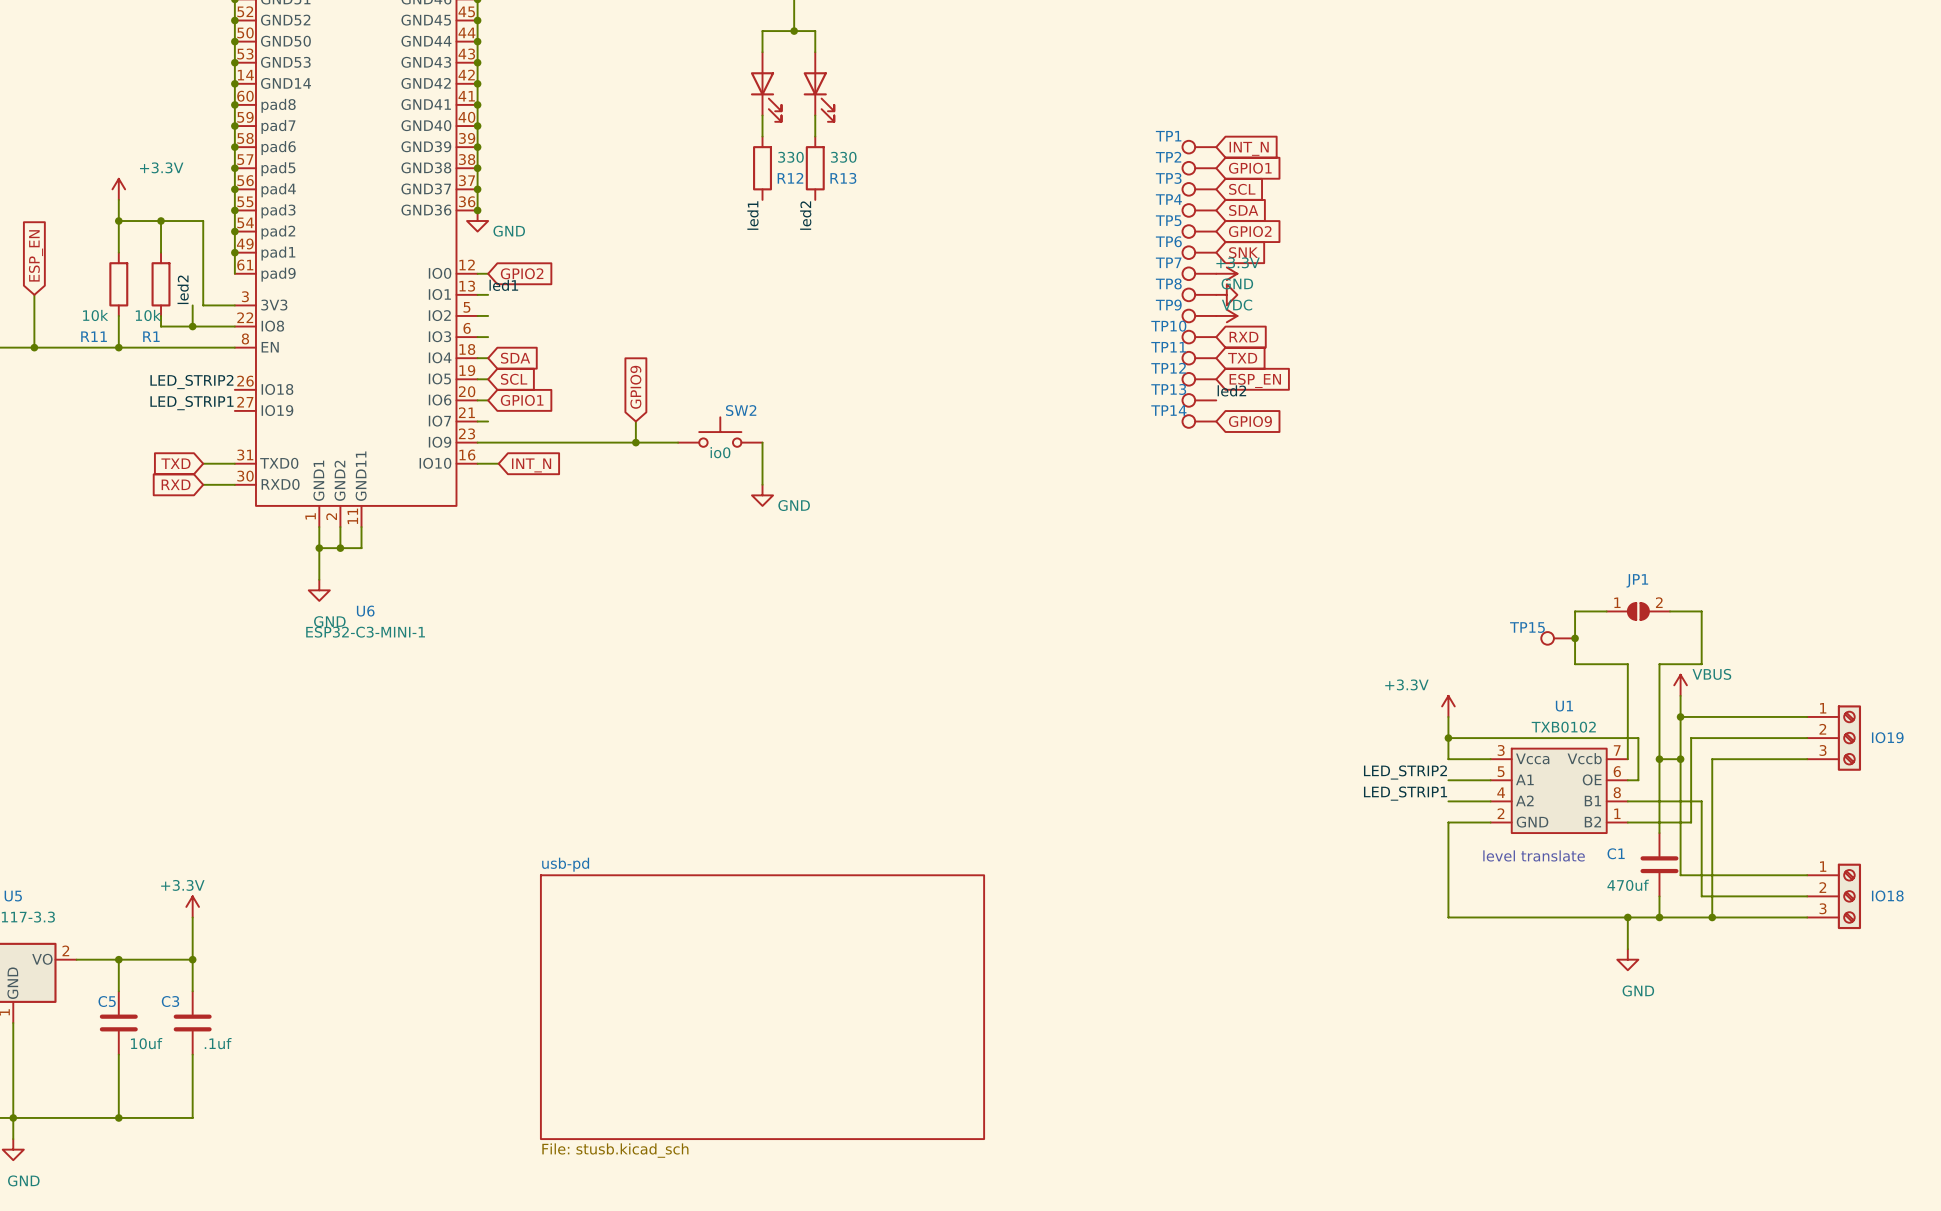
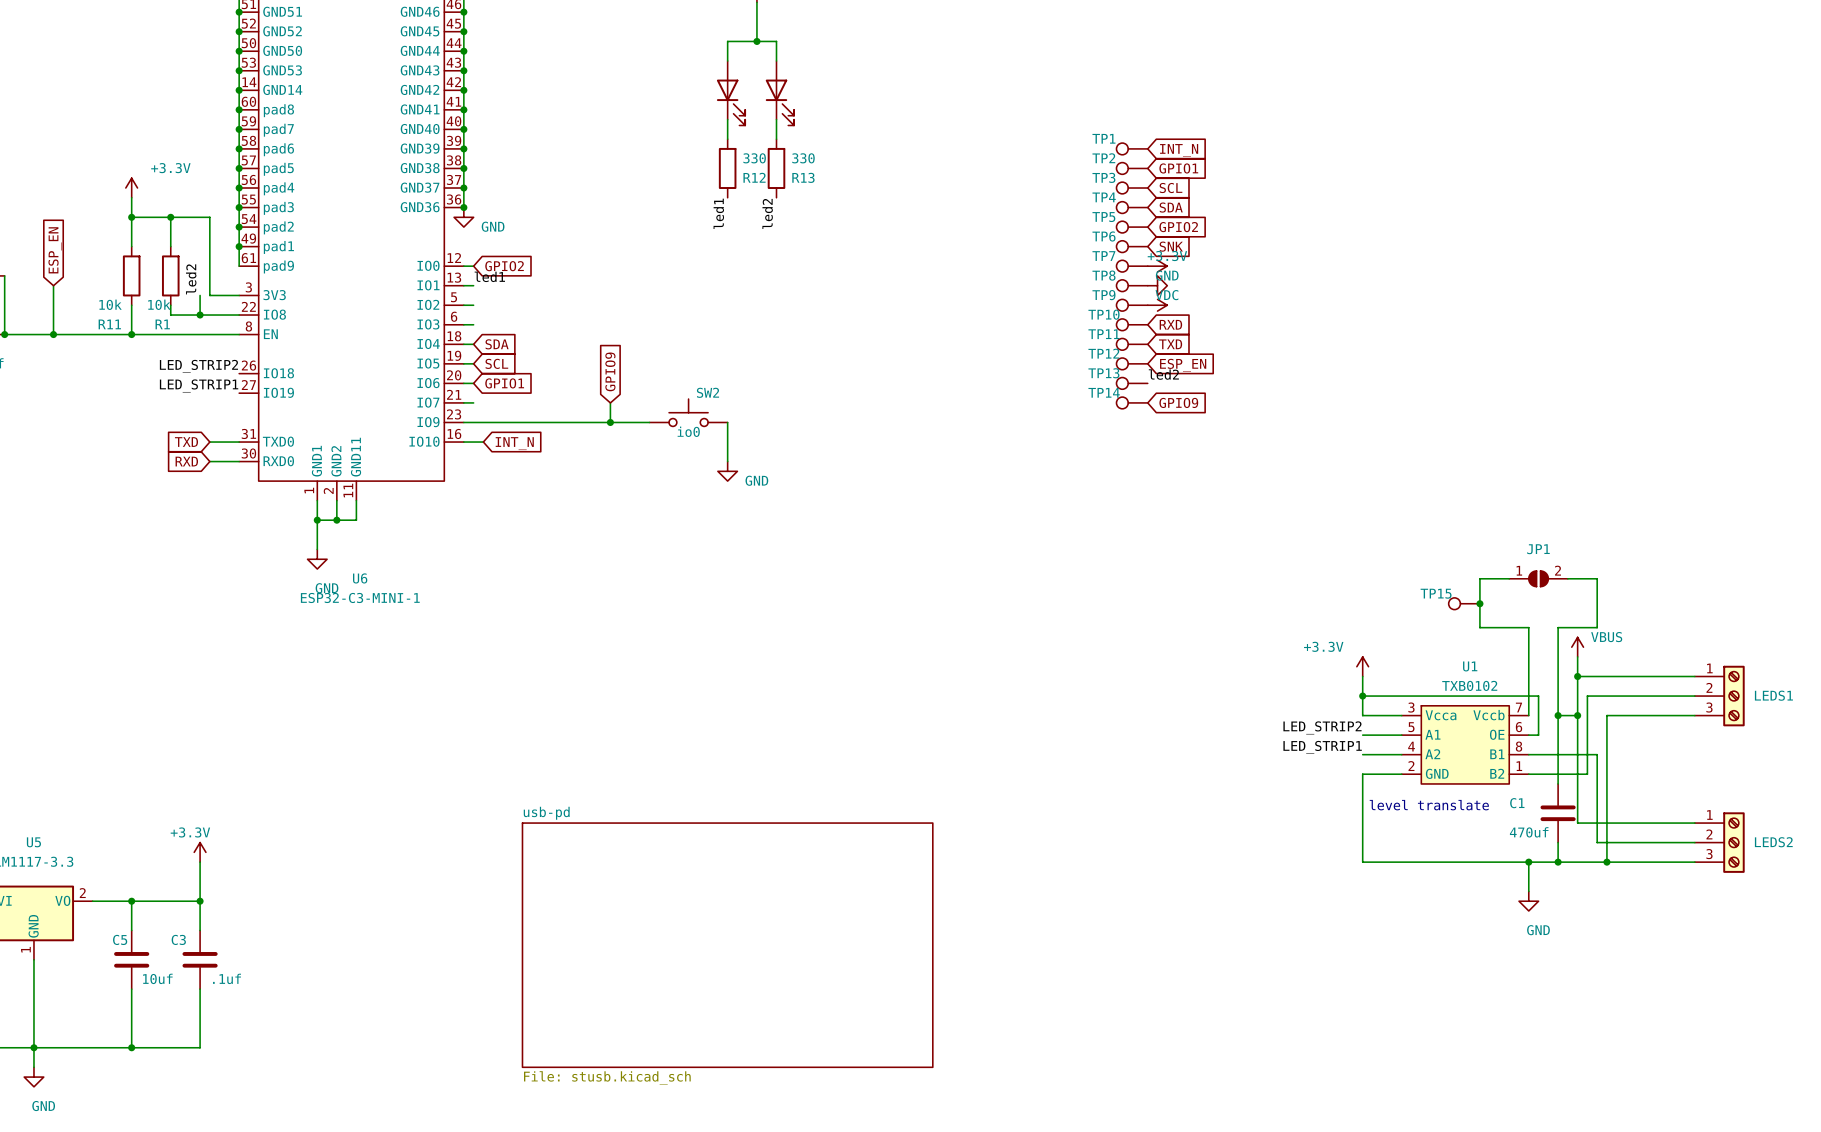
IO19 name: IO19 (1887, 737) -> LEDS1 (1773, 695)
IO18 name: IO18 (1887, 895) -> LEDS2 (1773, 842)

